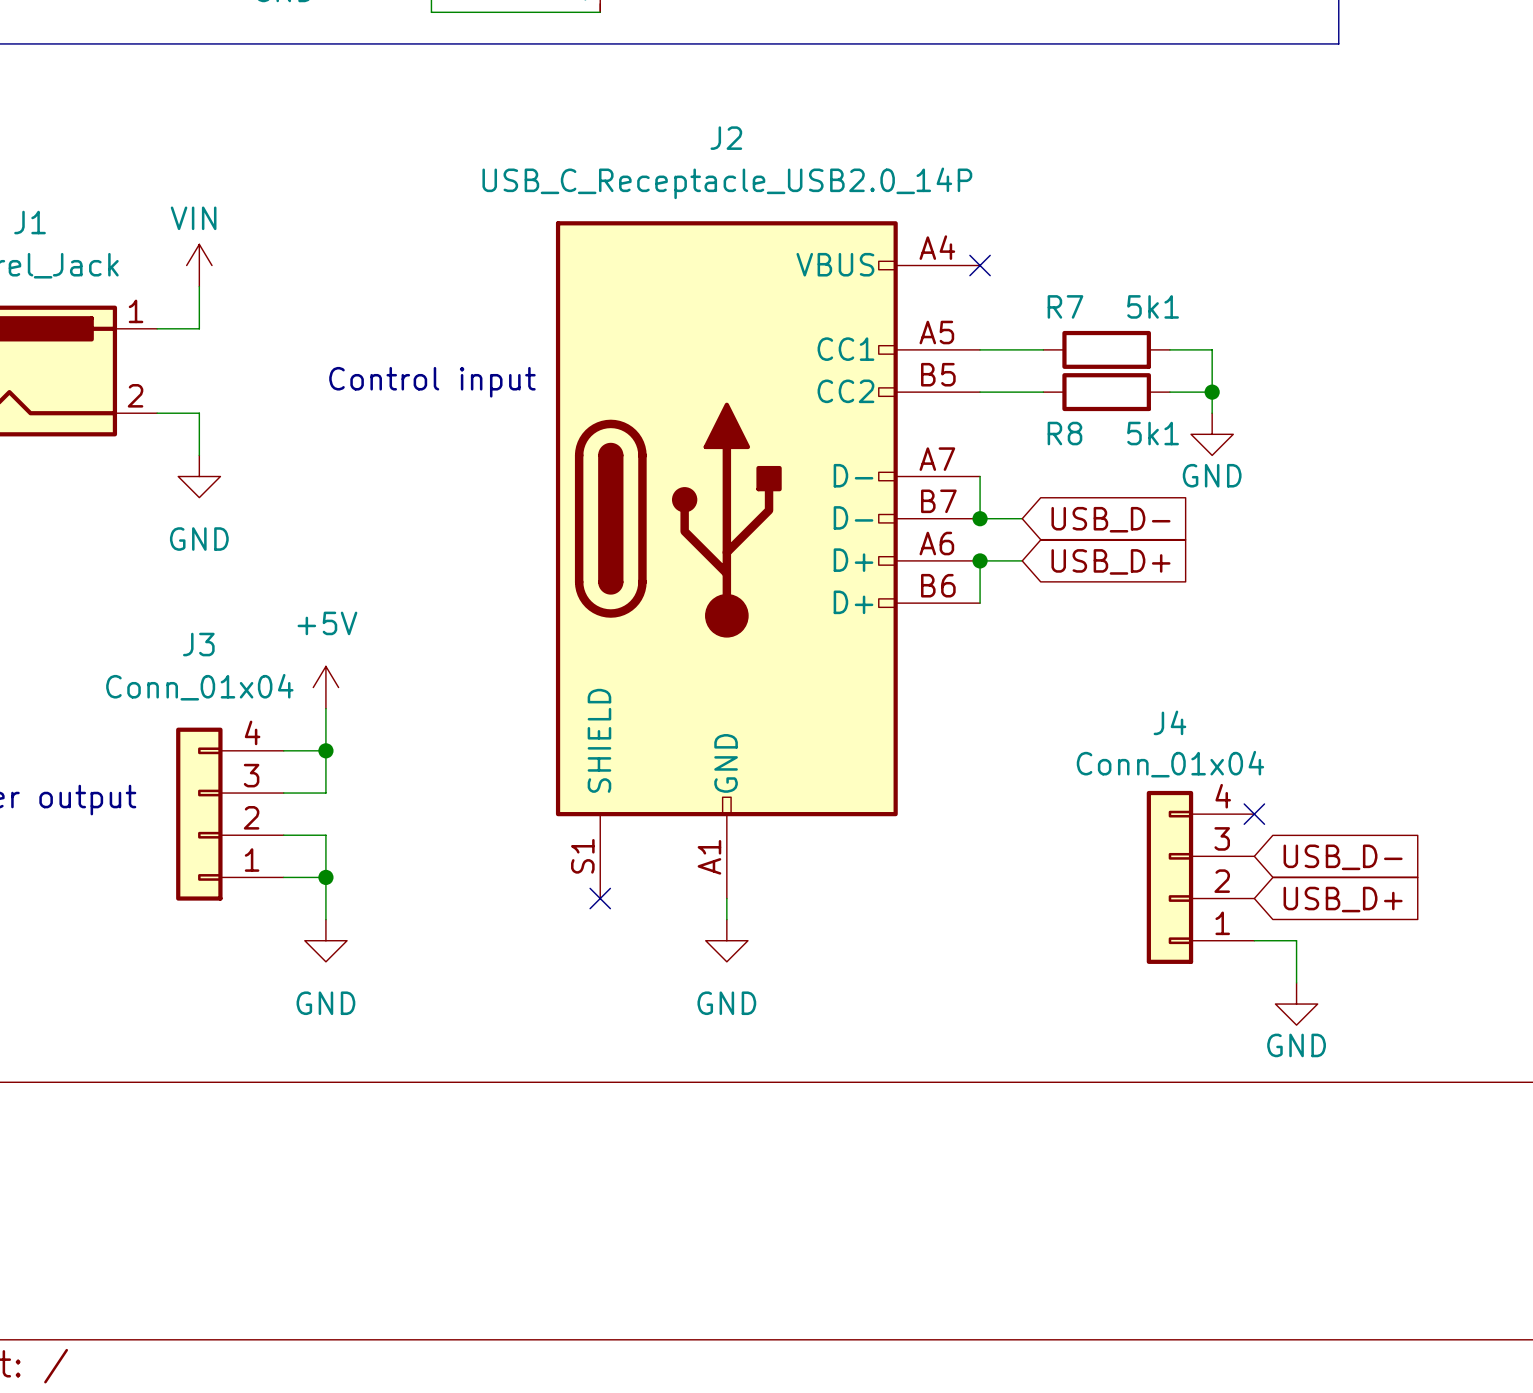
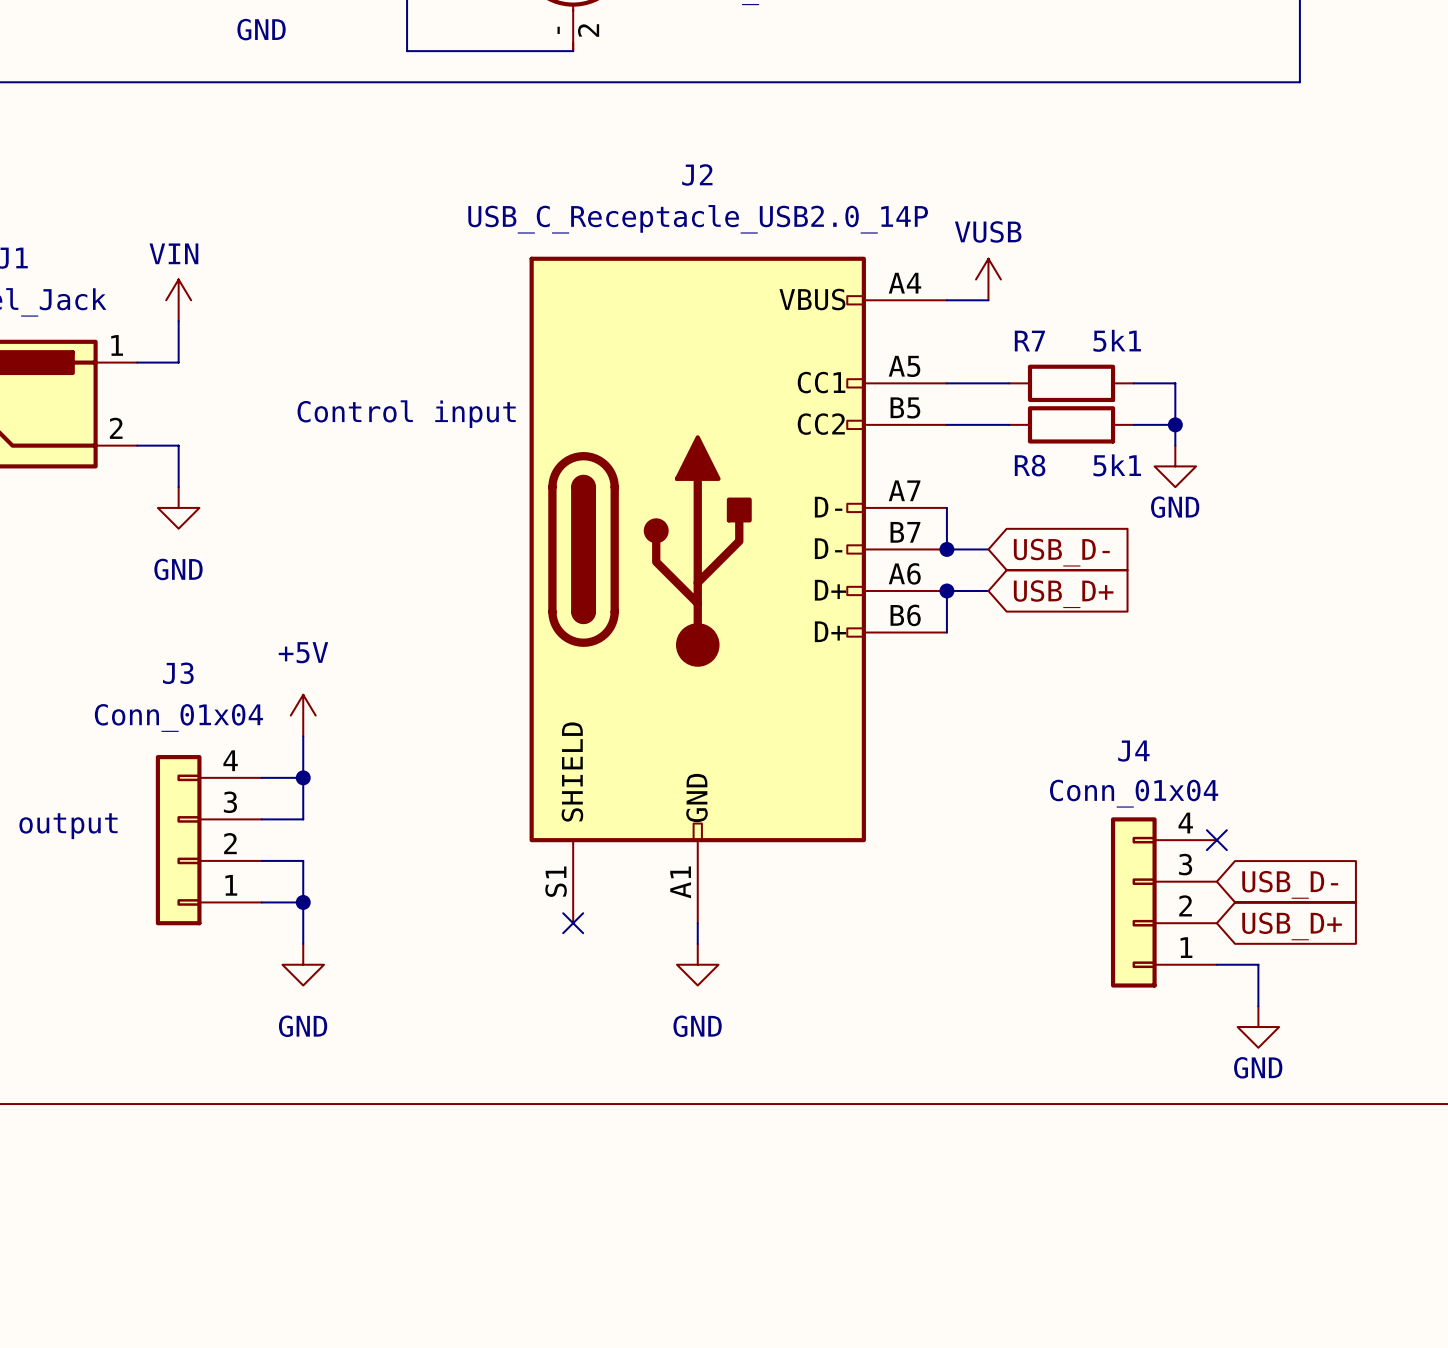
power symbol: none -> VUSB (988, 279)
wire: none -> (946, 300) (988, 300)
no-connect mark: (980, 265) -> none

